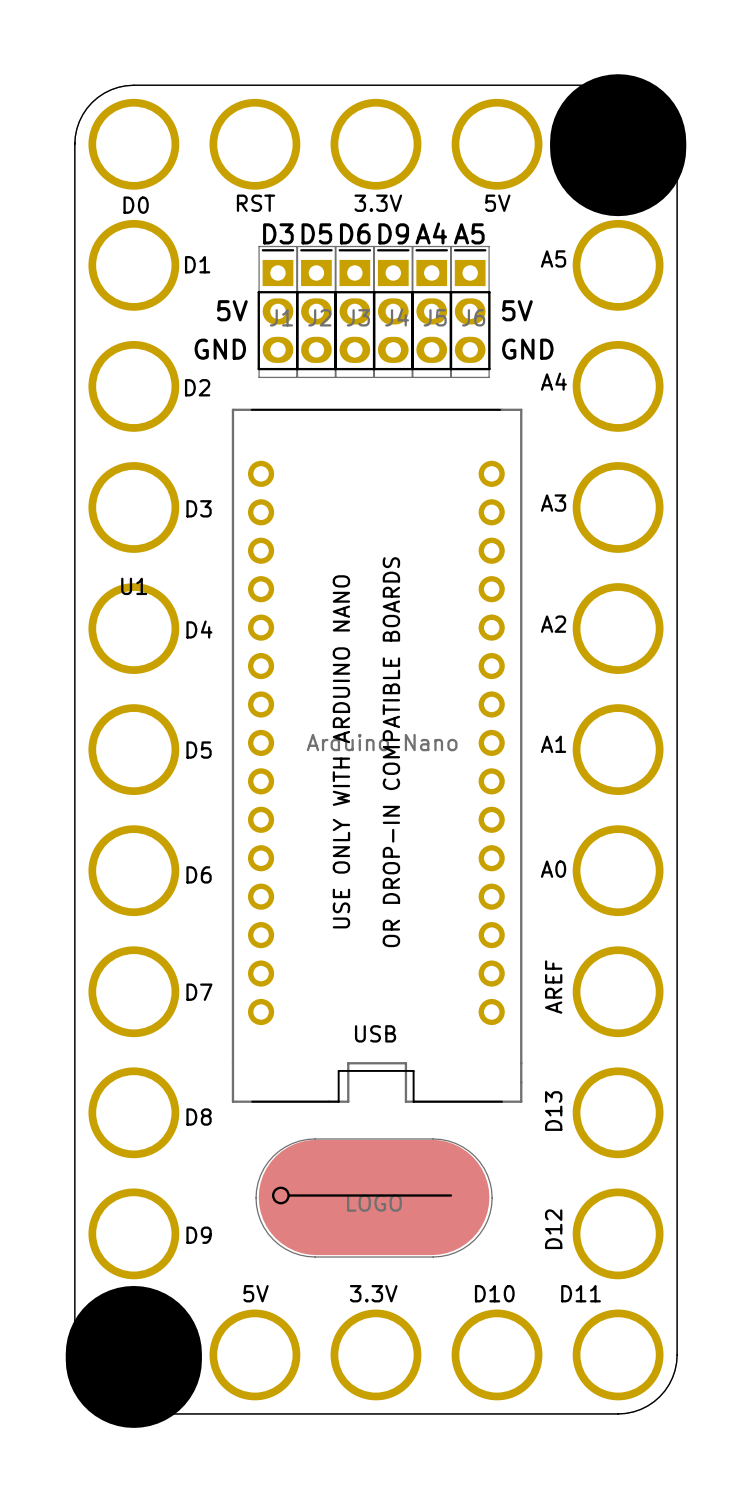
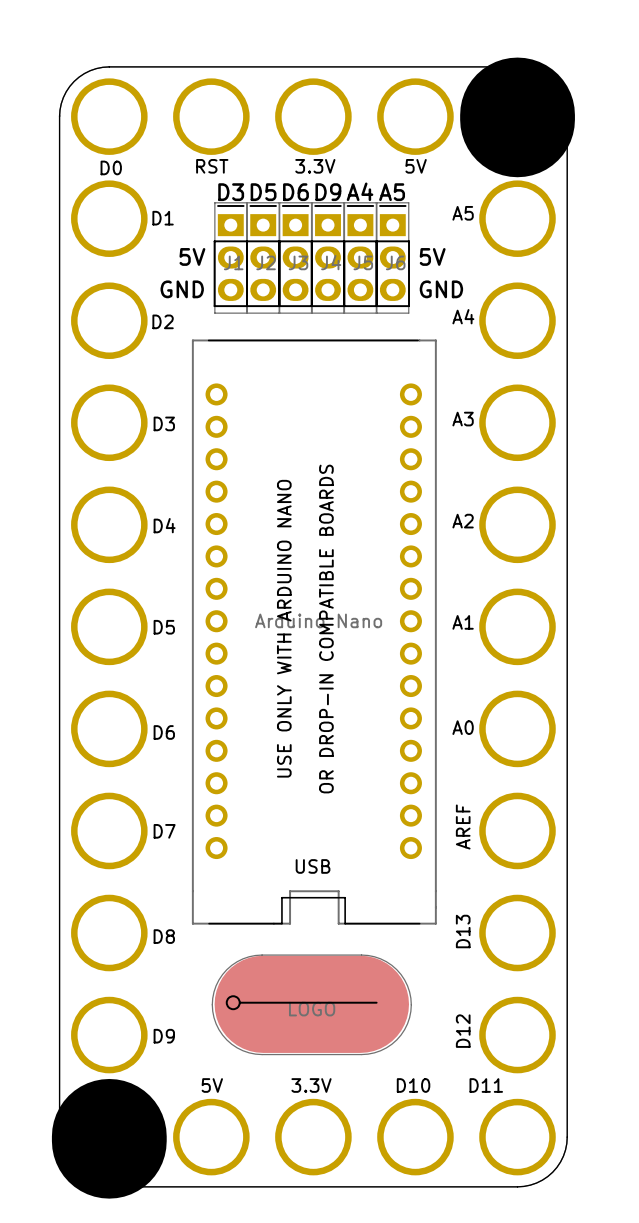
U1 name: U1 (134, 586) -> none

